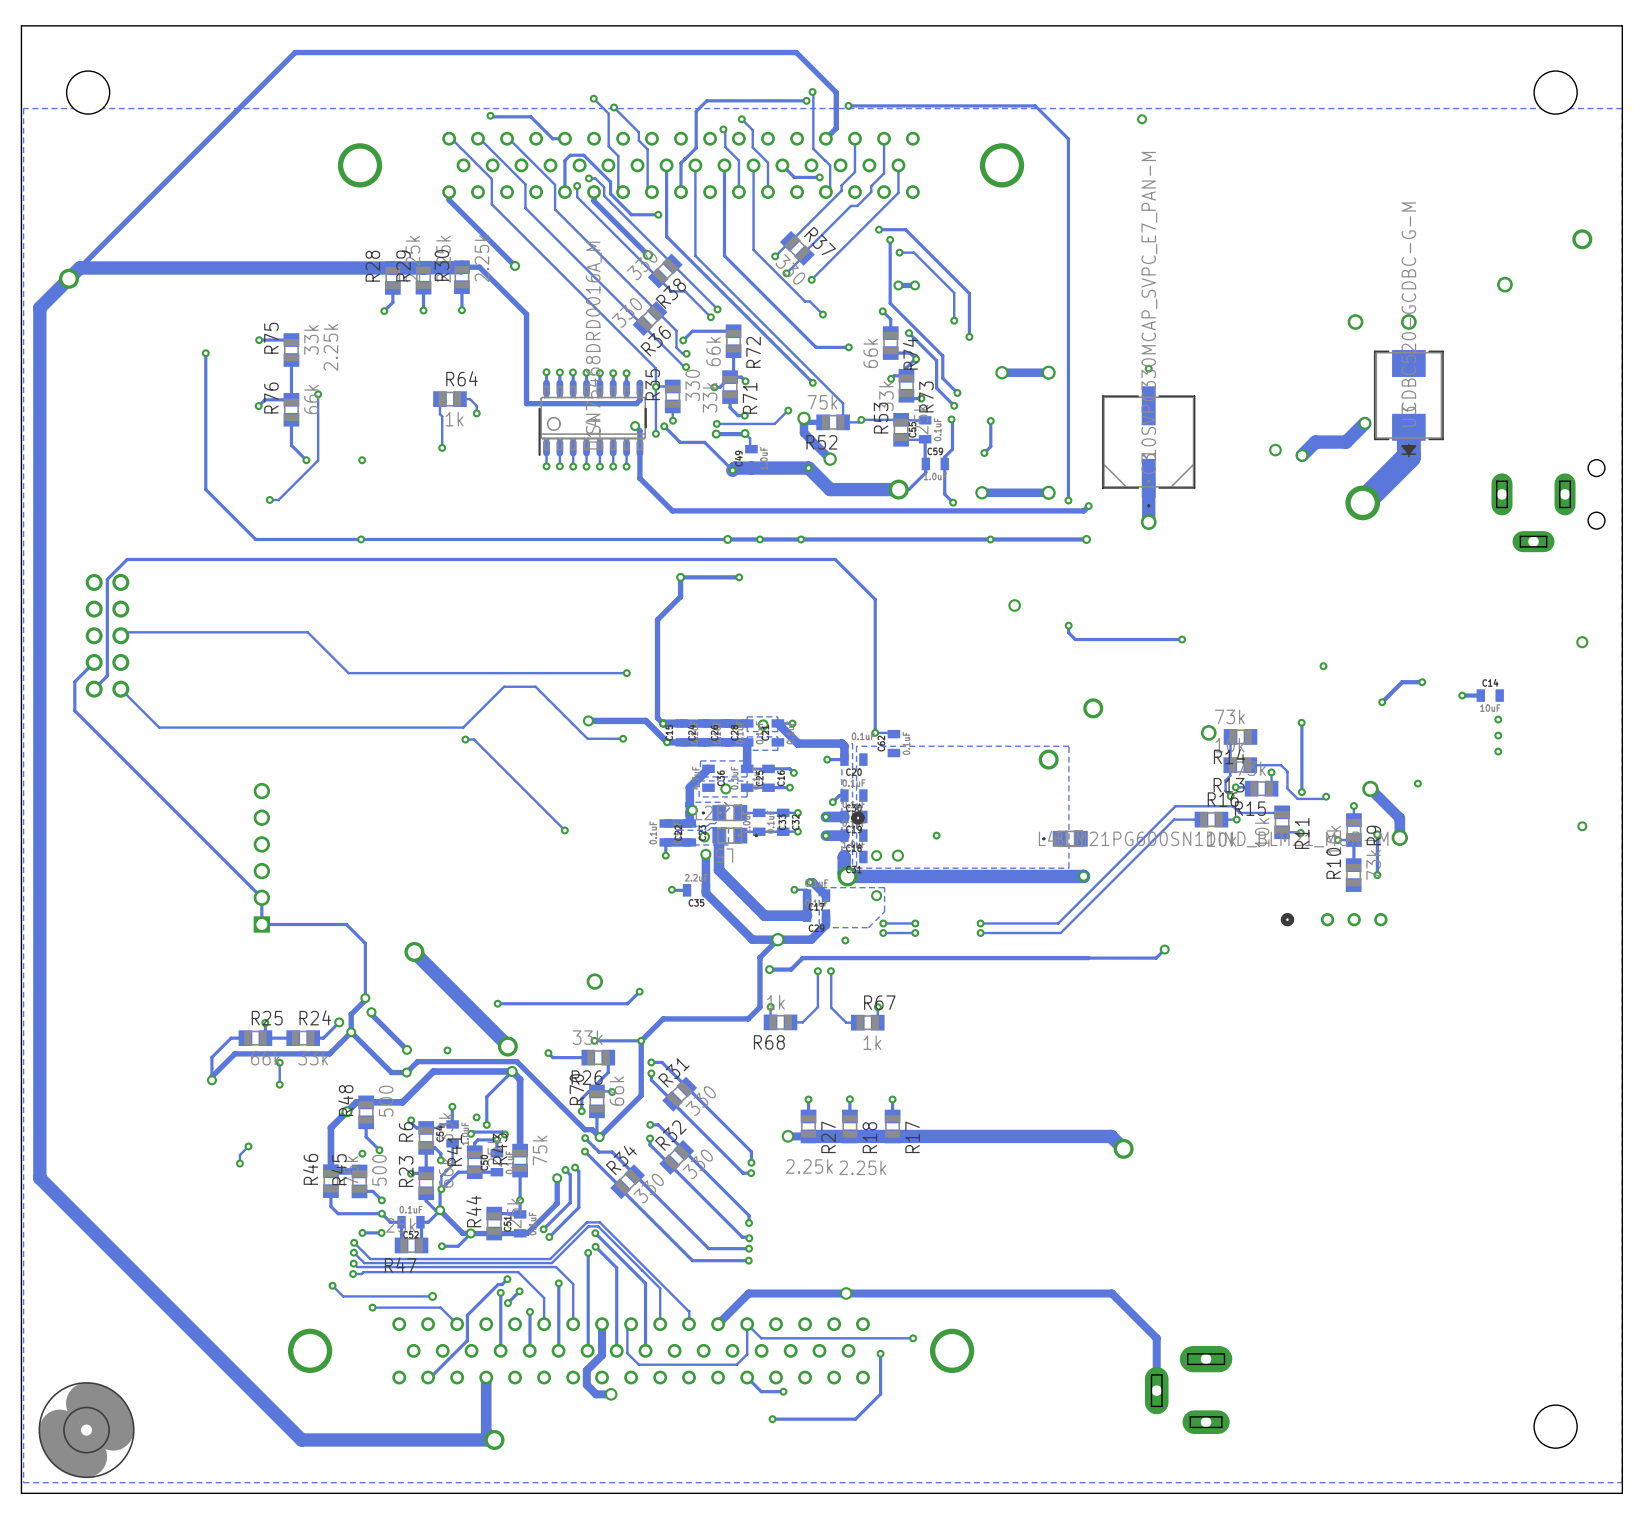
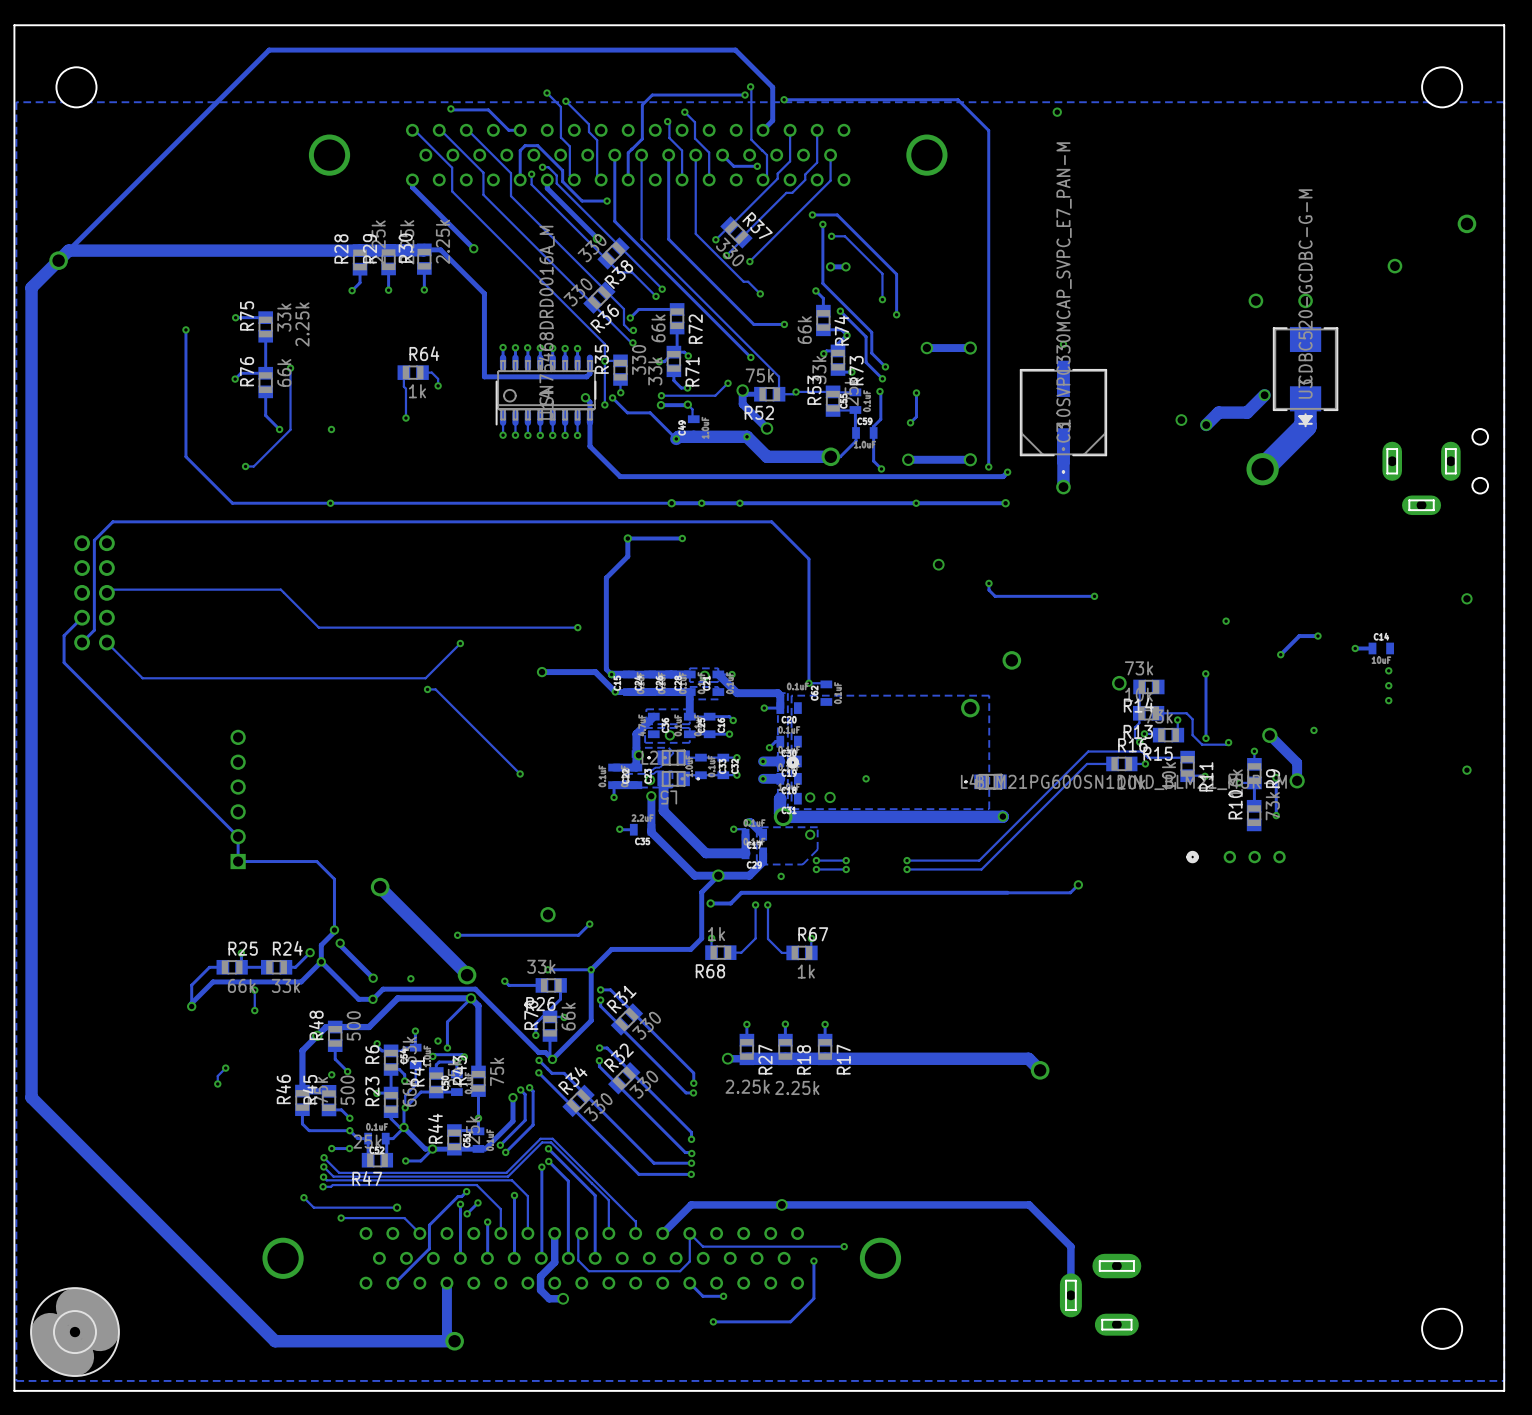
track: (500, 690) (504, 686) (535, 686) (587, 738) (623, 738) -> none
via: none -> (460, 643)
via: (623, 738) -> none

